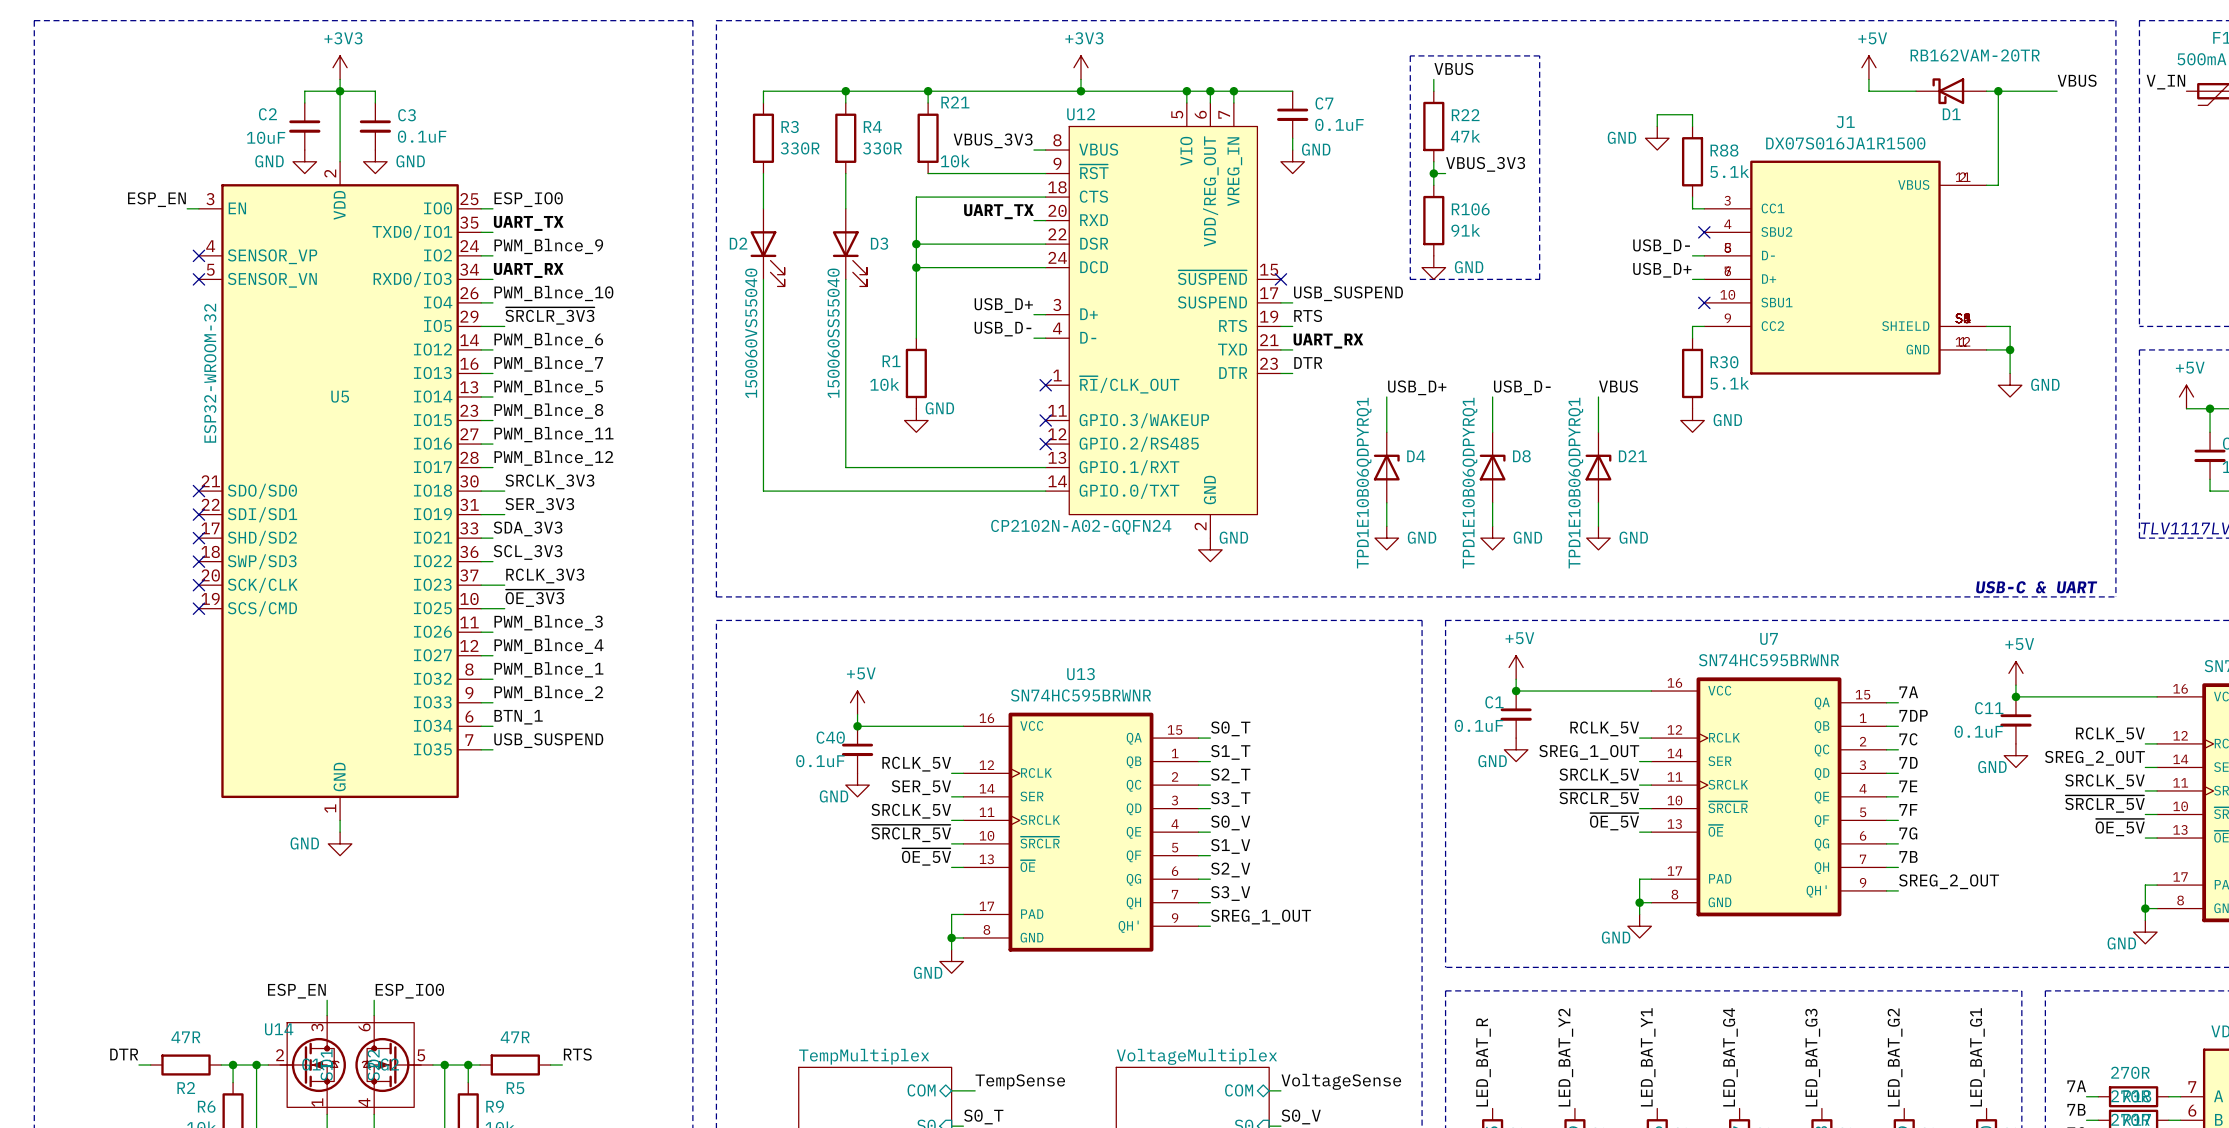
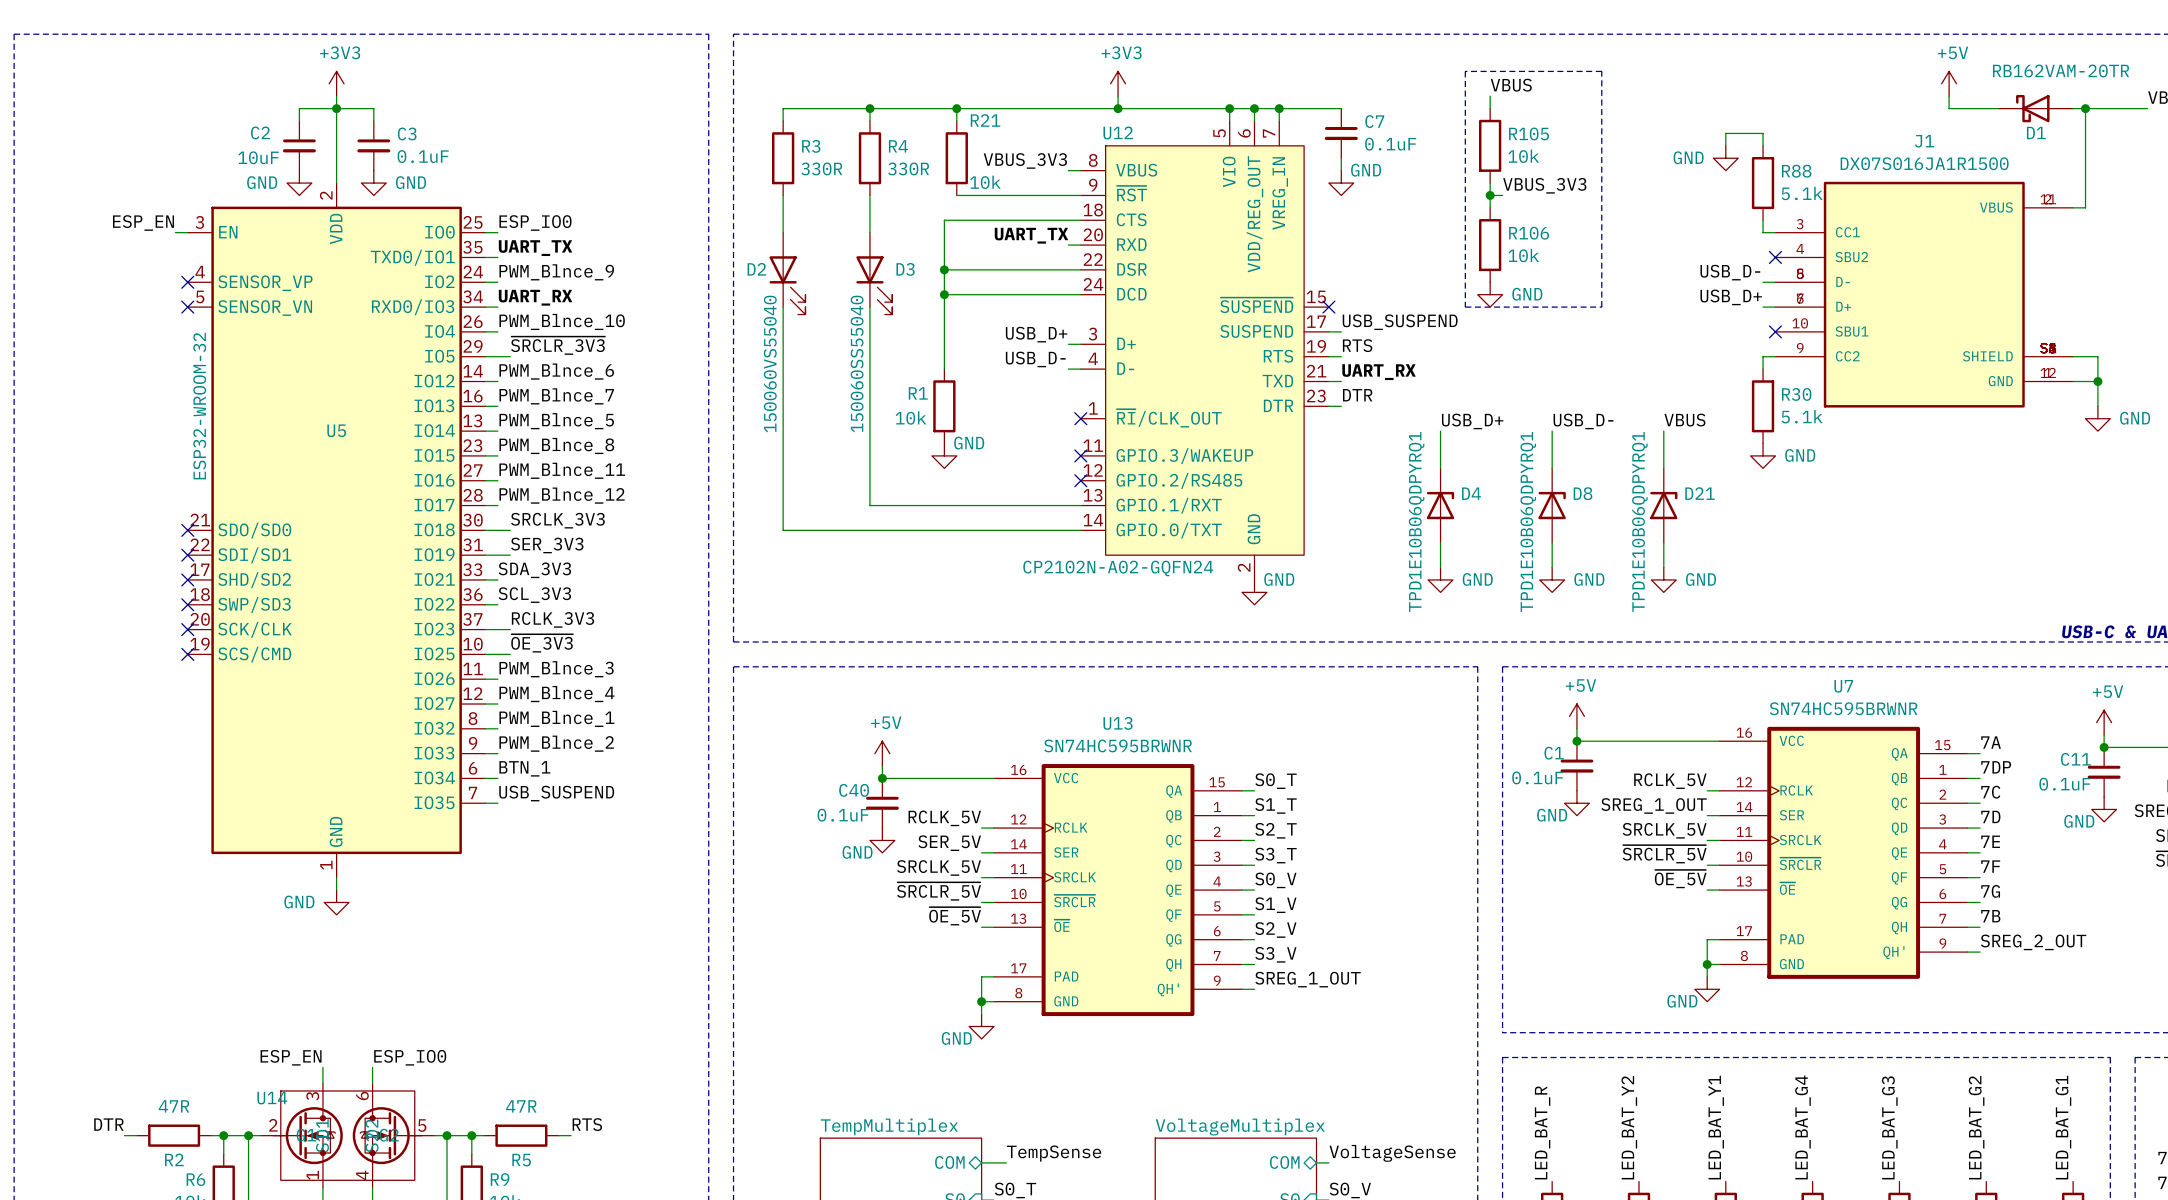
R22 name: R22 (1465, 115) -> R105 (1529, 133)
R22 value: 47k (1465, 136) -> 10k (1523, 156)
R106 value: 91k (1465, 230) -> 10k (1523, 255)

